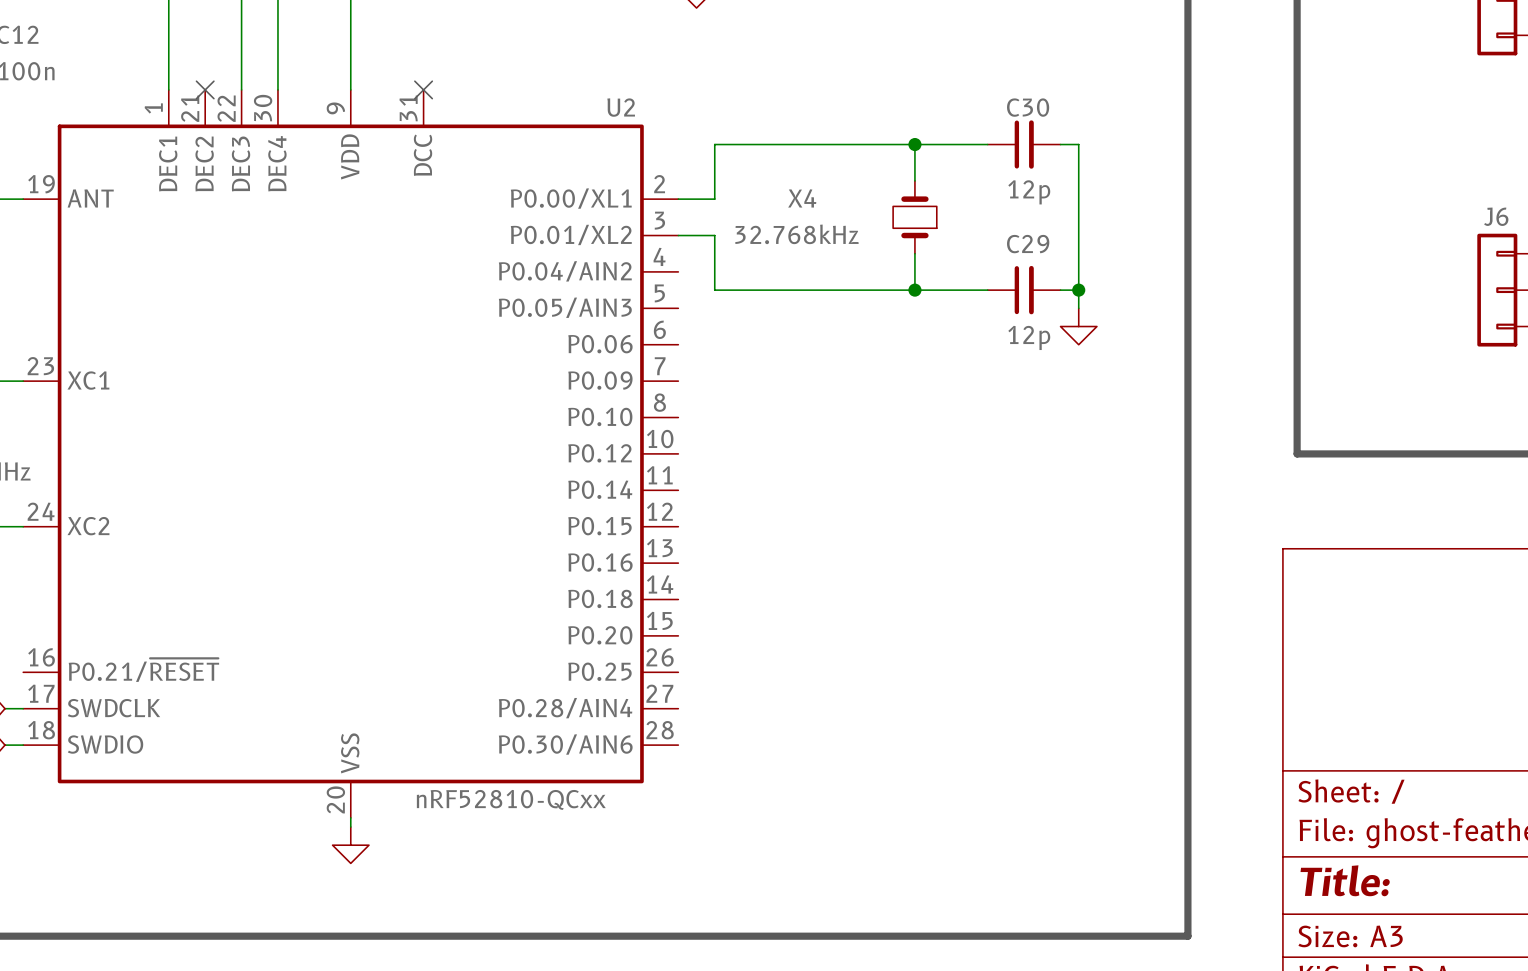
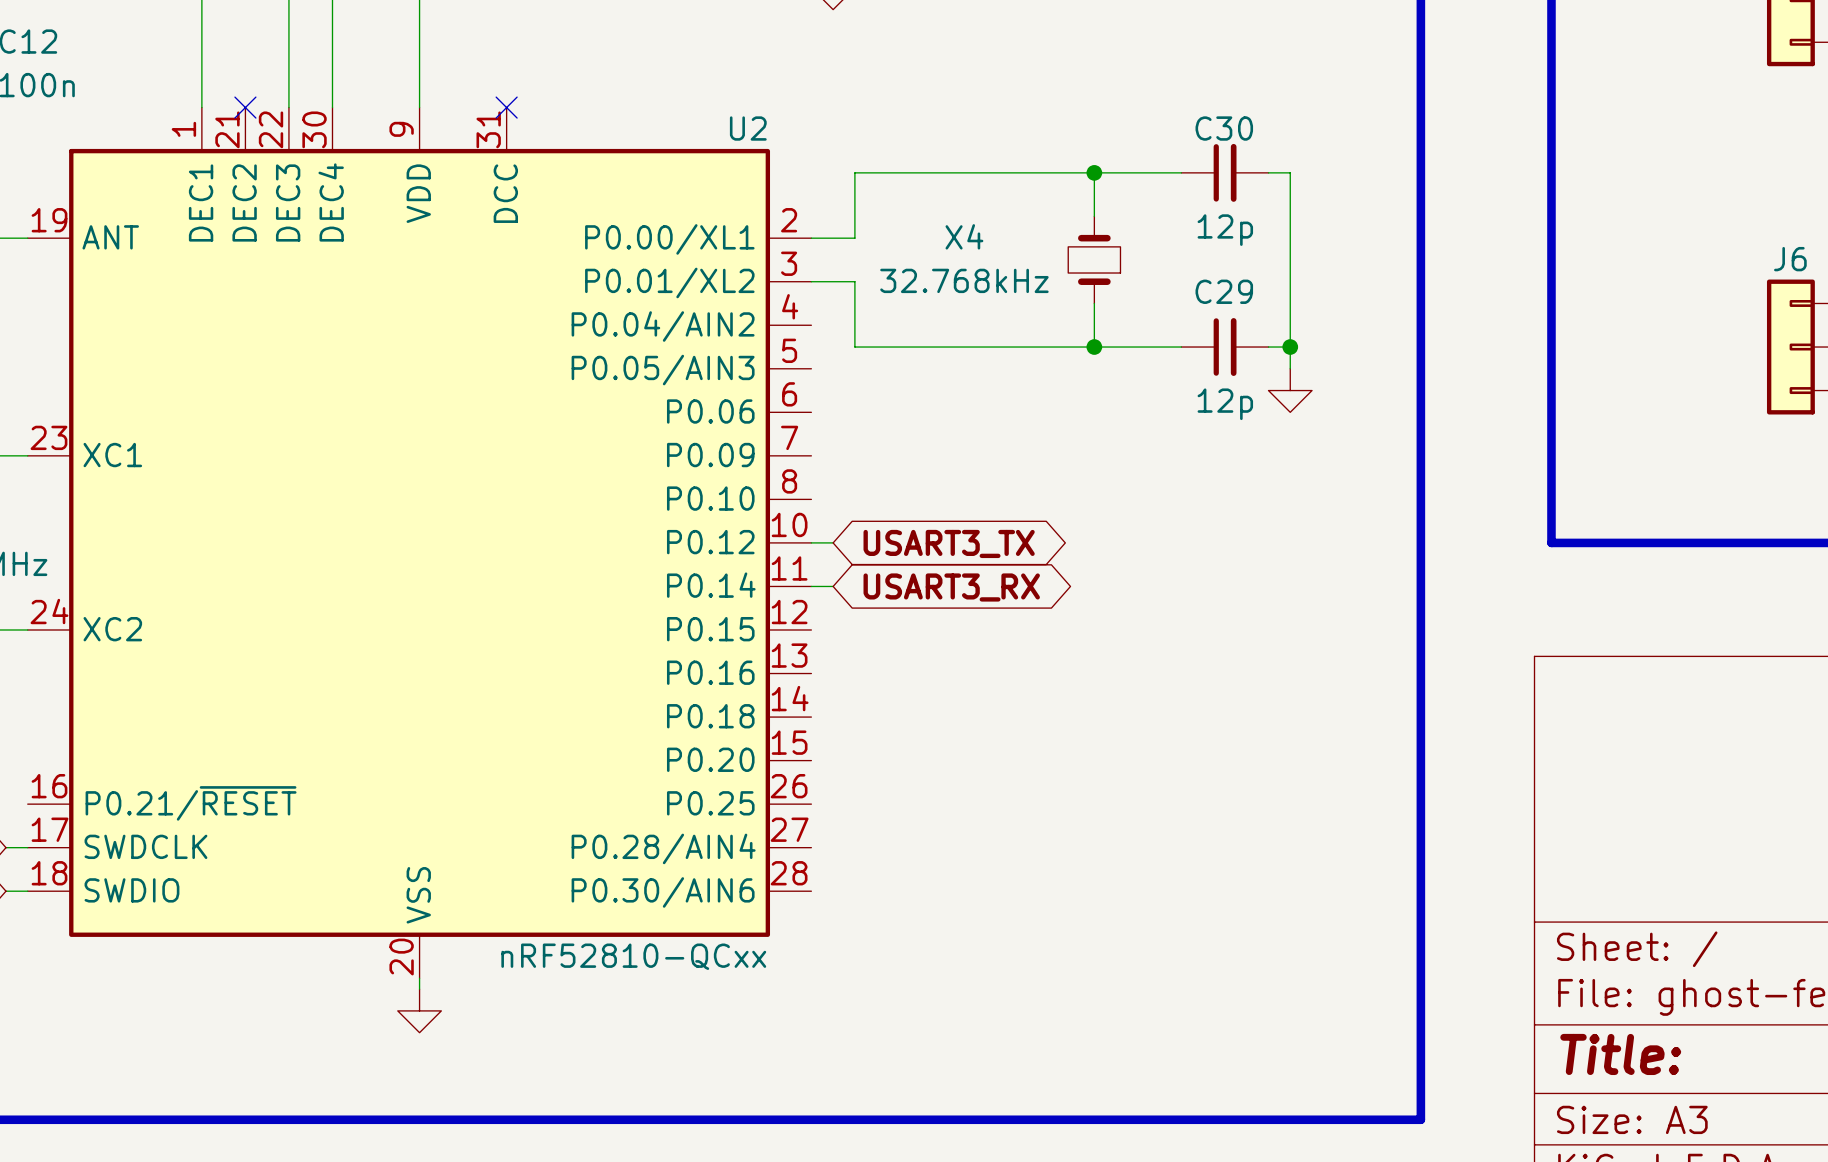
wire: none -> (811, 542) (833, 542)
global label: none -> USART3_TX (949, 543)
wire: none -> (811, 586) (833, 586)
global label: none -> USART3_RX (951, 587)

